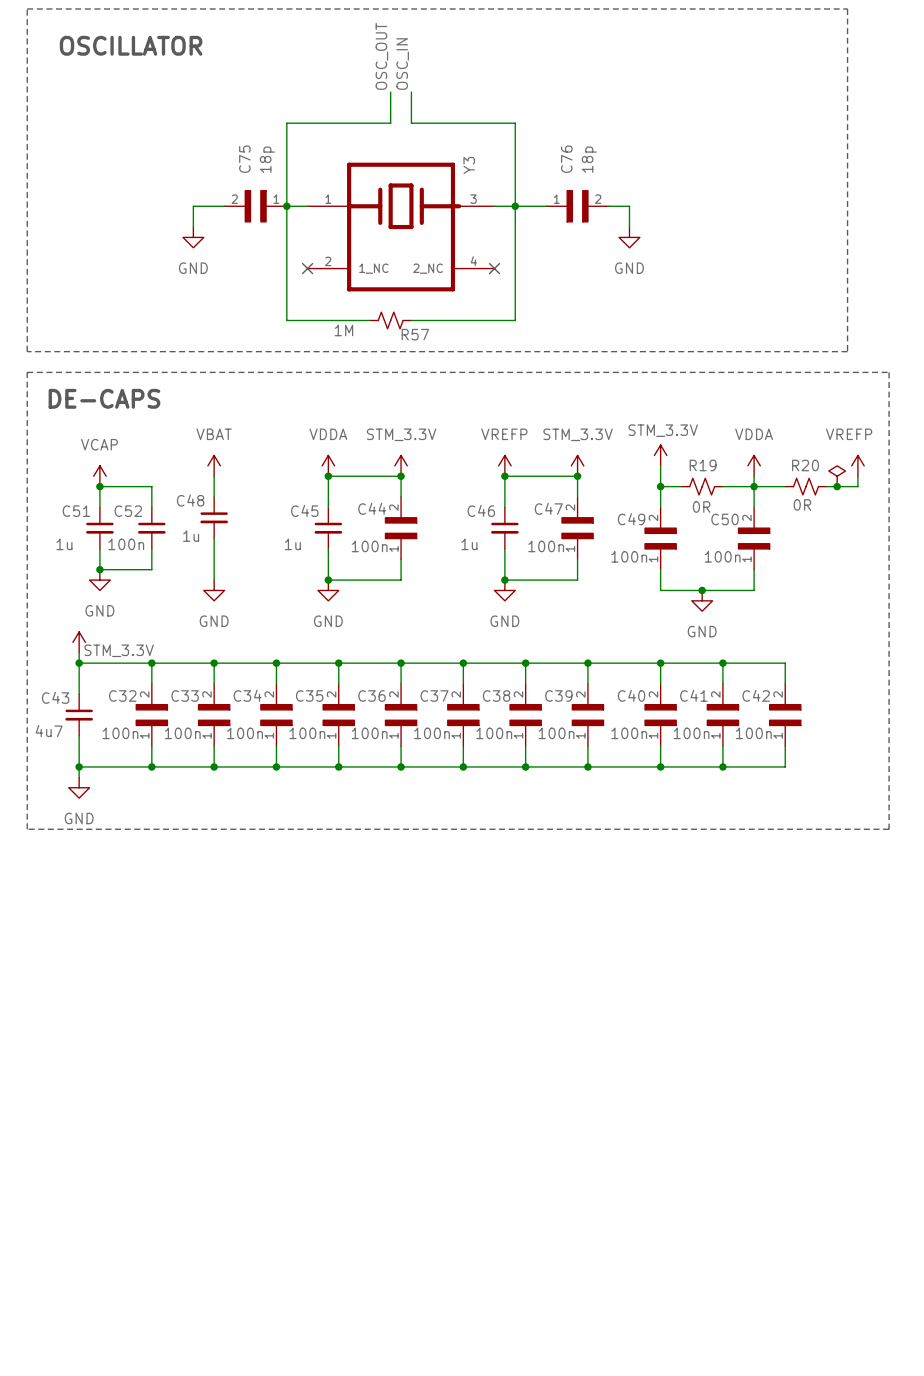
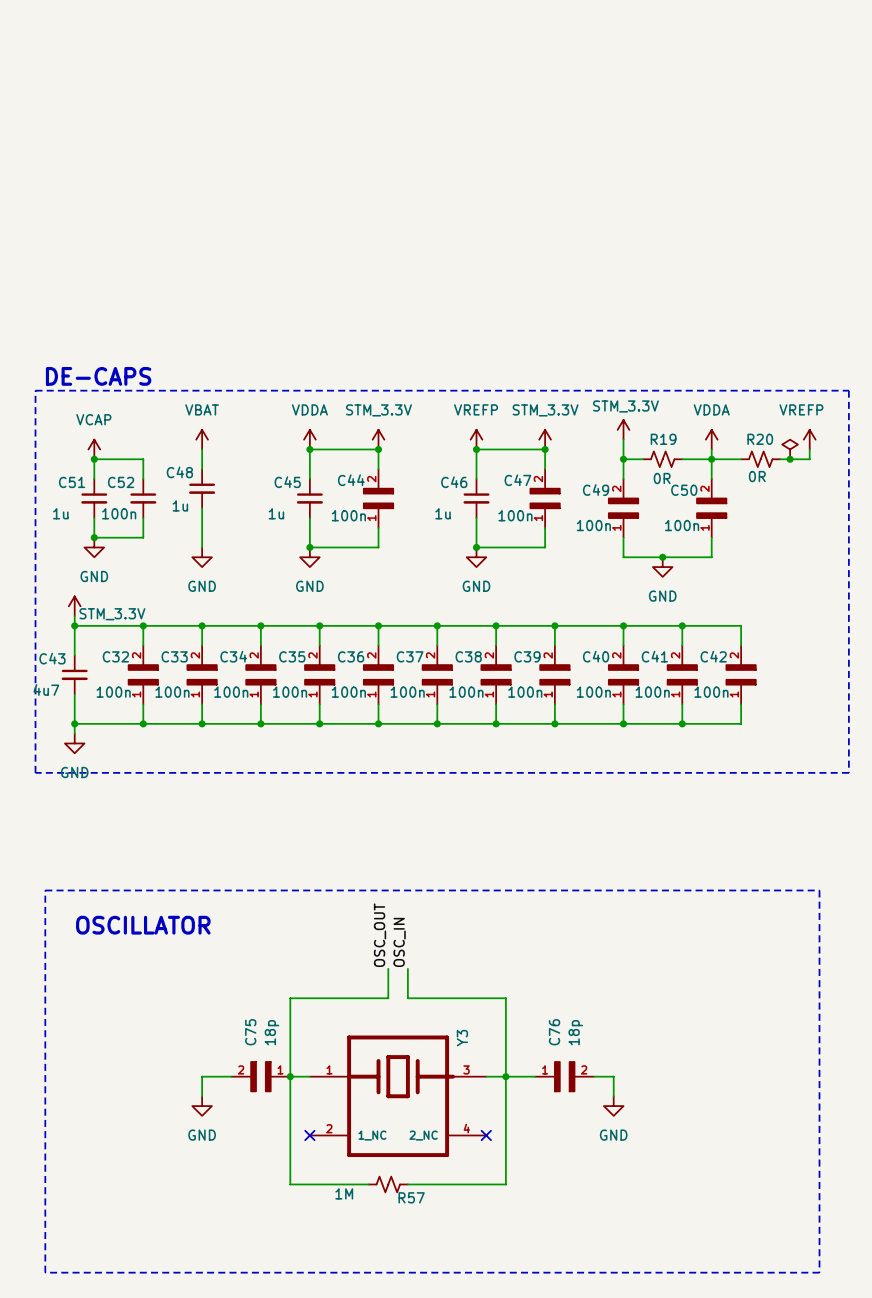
line: (27, 8) (847, 8) (847, 351) (27, 351) (27, 8) -> none
text: OSCILLATOR (131, 45) -> none
label: OSC_OUT (381, 56) -> none
label: OSC_IN (402, 64) -> none
wire: (390, 92) (390, 123) (286, 123) (286, 320) (369, 320) -> none
wire: (411, 92) (411, 123) (515, 123) (515, 320) (411, 320) -> none
wire: (224, 206) (193, 206) (193, 227) -> none
C75 position: (255, 206) -> (260, 1076)
wire: (286, 206) (307, 206) -> none
junction: (286, 206) -> none
wire: (494, 206) (546, 206) -> none
junction: (515, 206) -> none
C76 position: (577, 206) -> (564, 1076)
wire: (608, 206) (629, 206) (629, 227) -> none
Y3 position: (401, 227) -> (398, 1096)
power symbol: GND (193, 237) -> none
power symbol: GND (629, 237) -> none
no-connect mark: (307, 268) -> none
no-connect mark: (494, 268) -> none
R57 position: (390, 320) -> (388, 1184)
line: (27, 372) (27, 829) (889, 829) (889, 372) (27, 372) -> (35, 390) (35, 772) (848, 772) (848, 390) (35, 390)
line: none -> (45, 890) (819, 890) (819, 1272) (45, 1272) (45, 890)
text: none -> OSCILLATOR (143, 925)
label: none -> OSC_OUT (380, 935)
label: none -> OSC_IN (399, 942)
wire: none -> (388, 968) (388, 998) (290, 998) (290, 1184) (368, 1184)
wire: none -> (407, 968) (407, 998) (505, 998) (505, 1184) (407, 1184)
wire: none -> (231, 1076) (202, 1076) (202, 1096)
wire: none -> (290, 1076) (309, 1076)
junction: none -> (290, 1076)
wire: none -> (486, 1076) (535, 1076)
junction: none -> (505, 1076)
wire: none -> (594, 1076) (613, 1076) (613, 1096)
power symbol: none -> GND (202, 1106)
power symbol: none -> GND (613, 1106)
no-connect mark: none -> (309, 1135)
no-connect mark: none -> (486, 1135)

